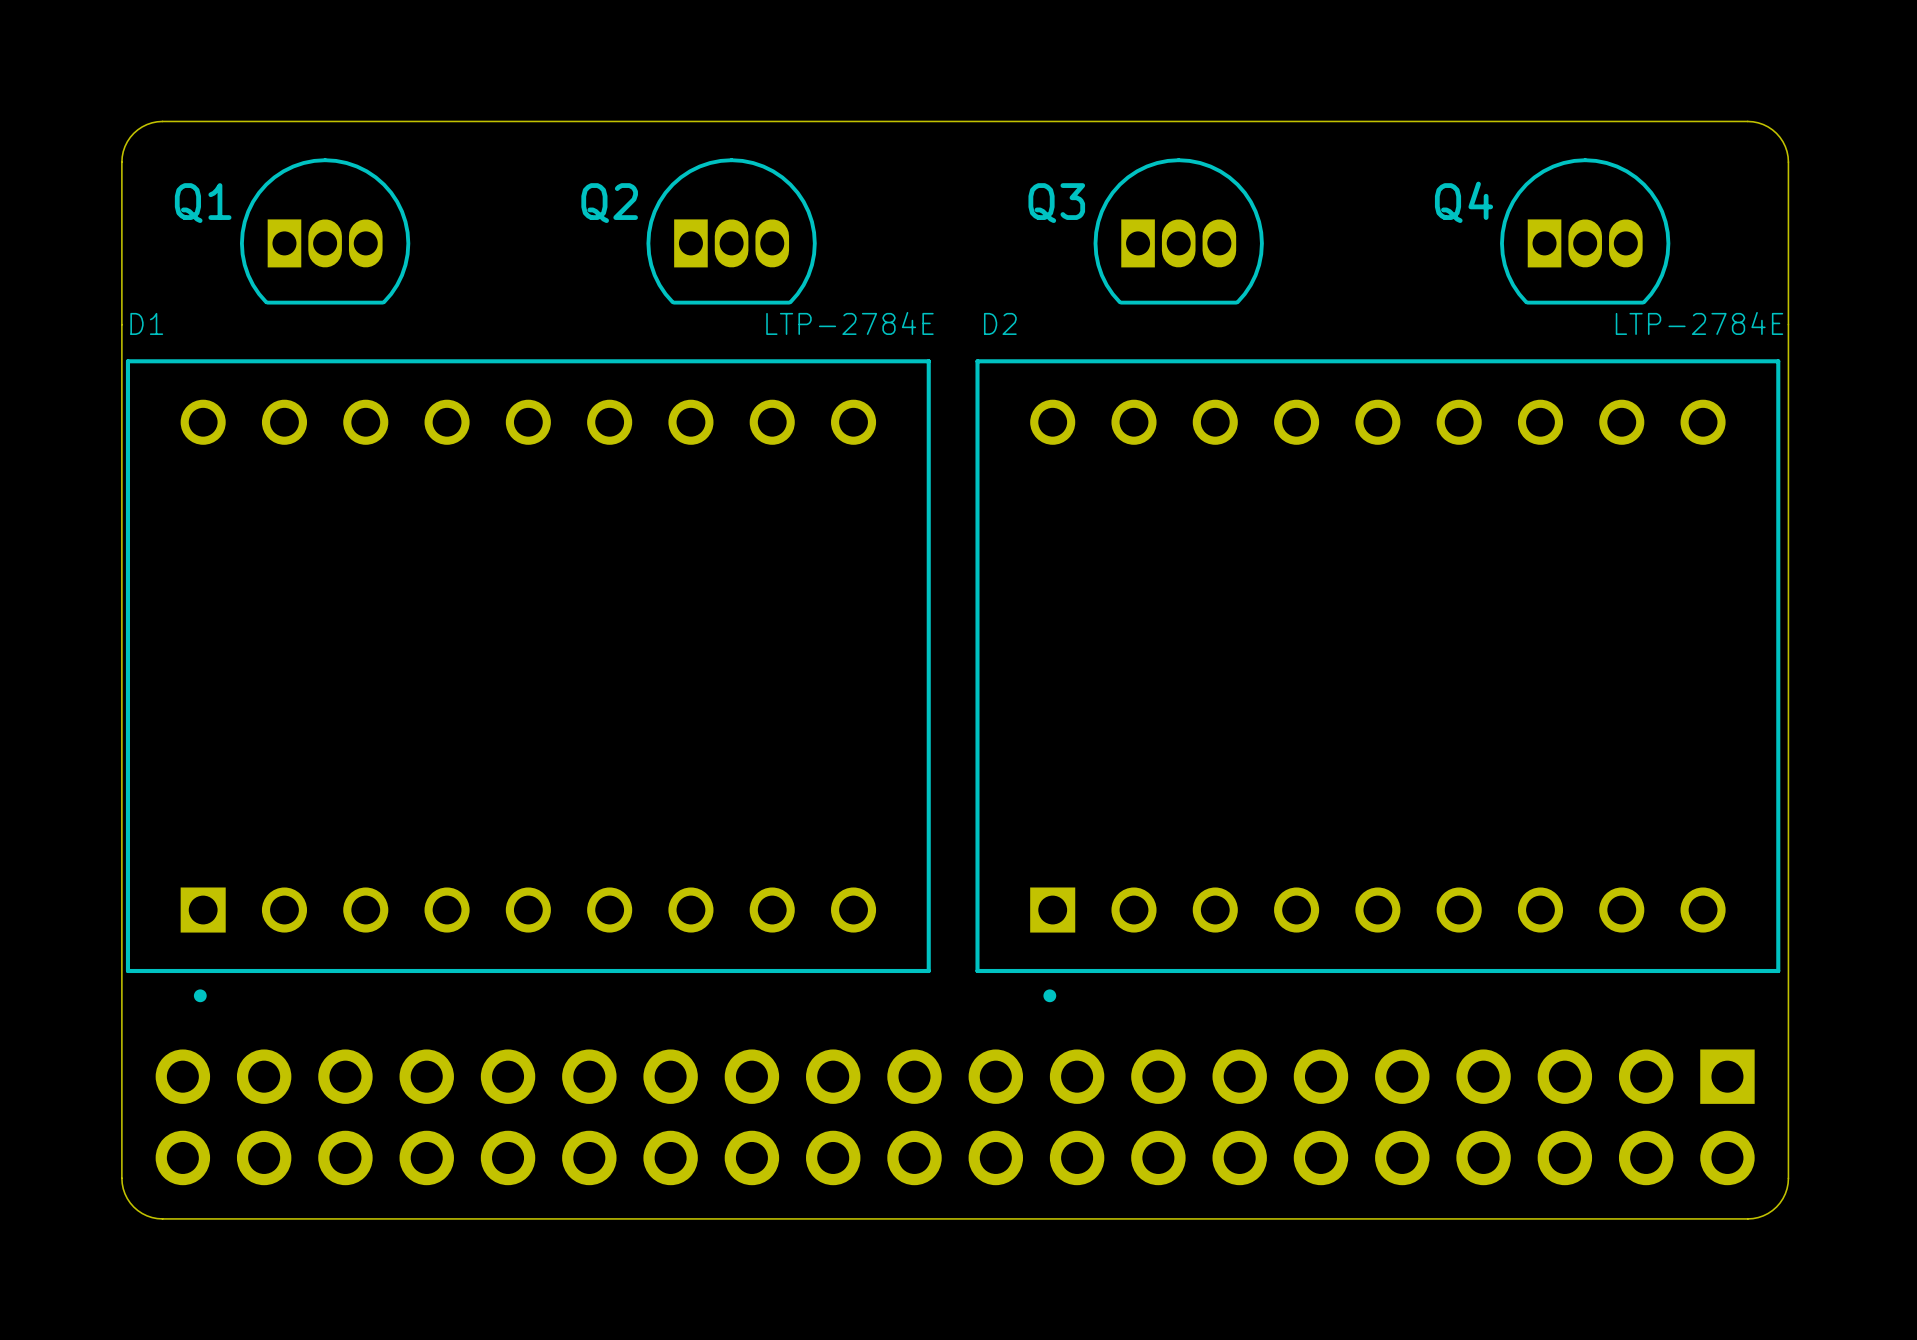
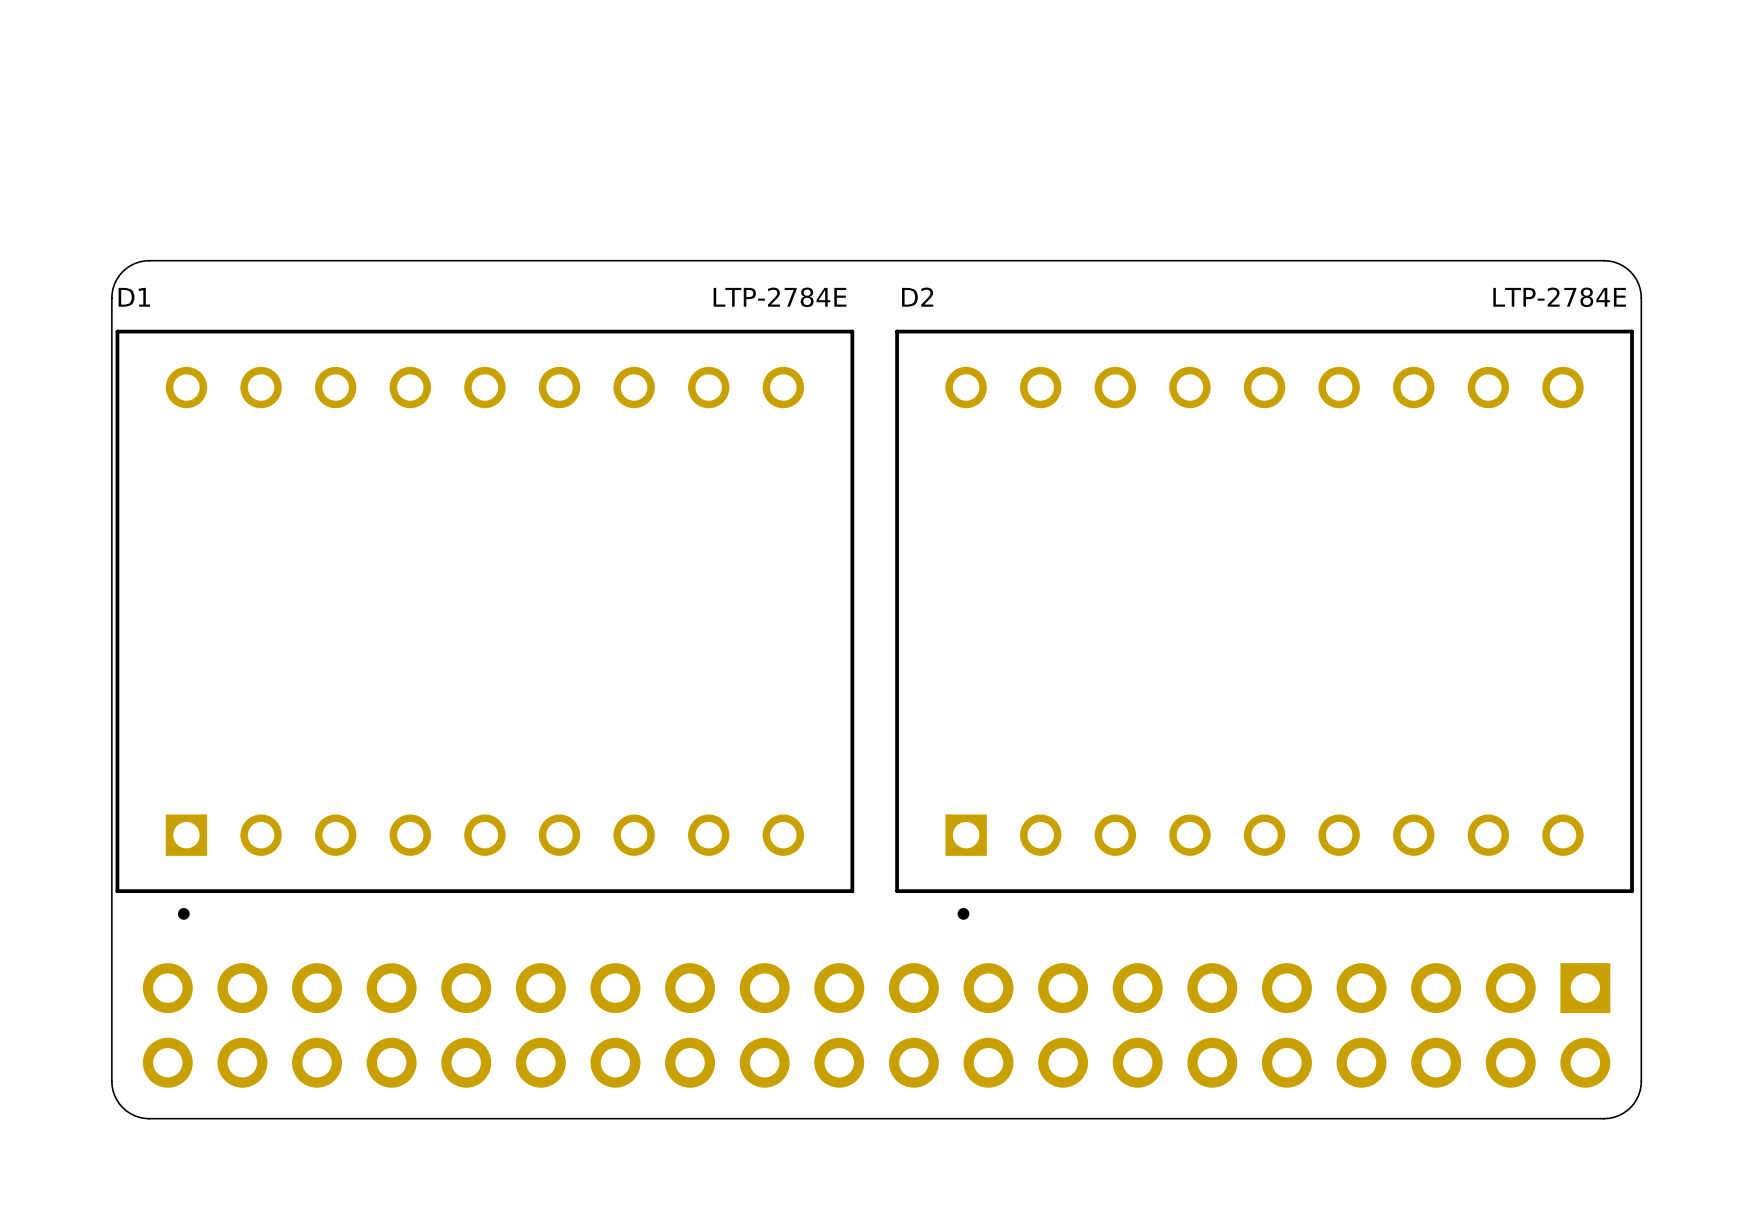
Q1: (325, 231) -> none
Q2: (731, 231) -> none
Q3: (1178, 231) -> none
Q4: (1585, 231) -> none
board edge: (121, 324) (123, 151) (130, 137) (137, 129) (152, 122) (162, 121) (1753, 121) (1768, 126) (1776, 133) (1782, 141) (1788, 156) (1788, 324) -> (111, 297) (114, 283) (122, 271) (134, 263) (149, 260) (1604, 260) (1618, 263) (1630, 271) (1638, 283) (1641, 297)

